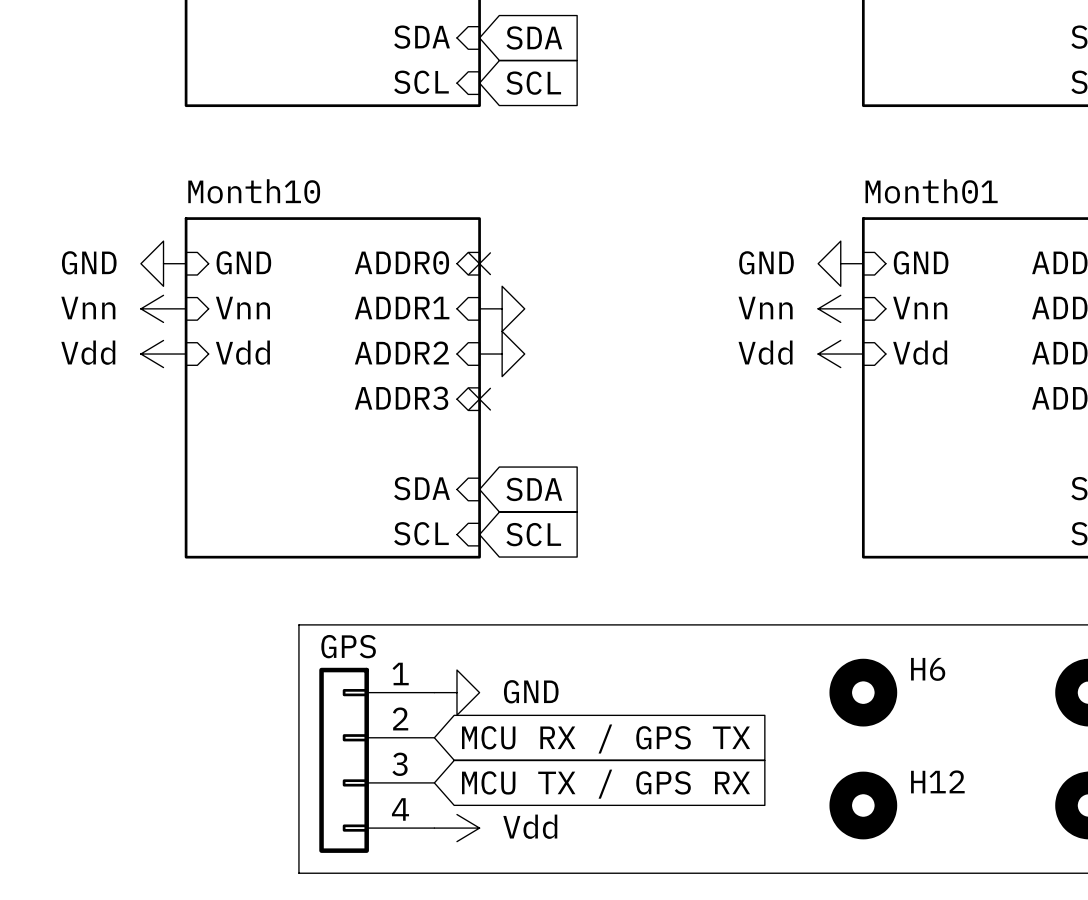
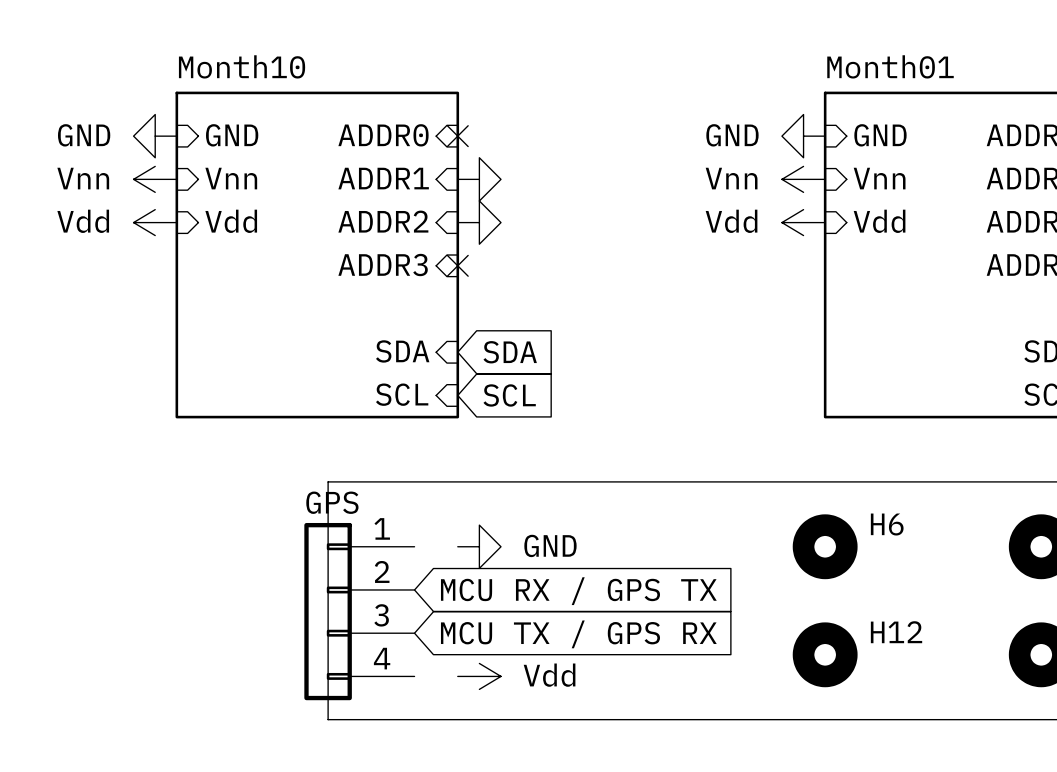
line: (344, 624) (298, 624) (298, 873) (344, 873) -> (328, 481) (328, 719)
power symbol position: GND (456, 692) -> GND (479, 546)
power symbol position: Vdd (456, 828) -> Vdd (479, 676)

